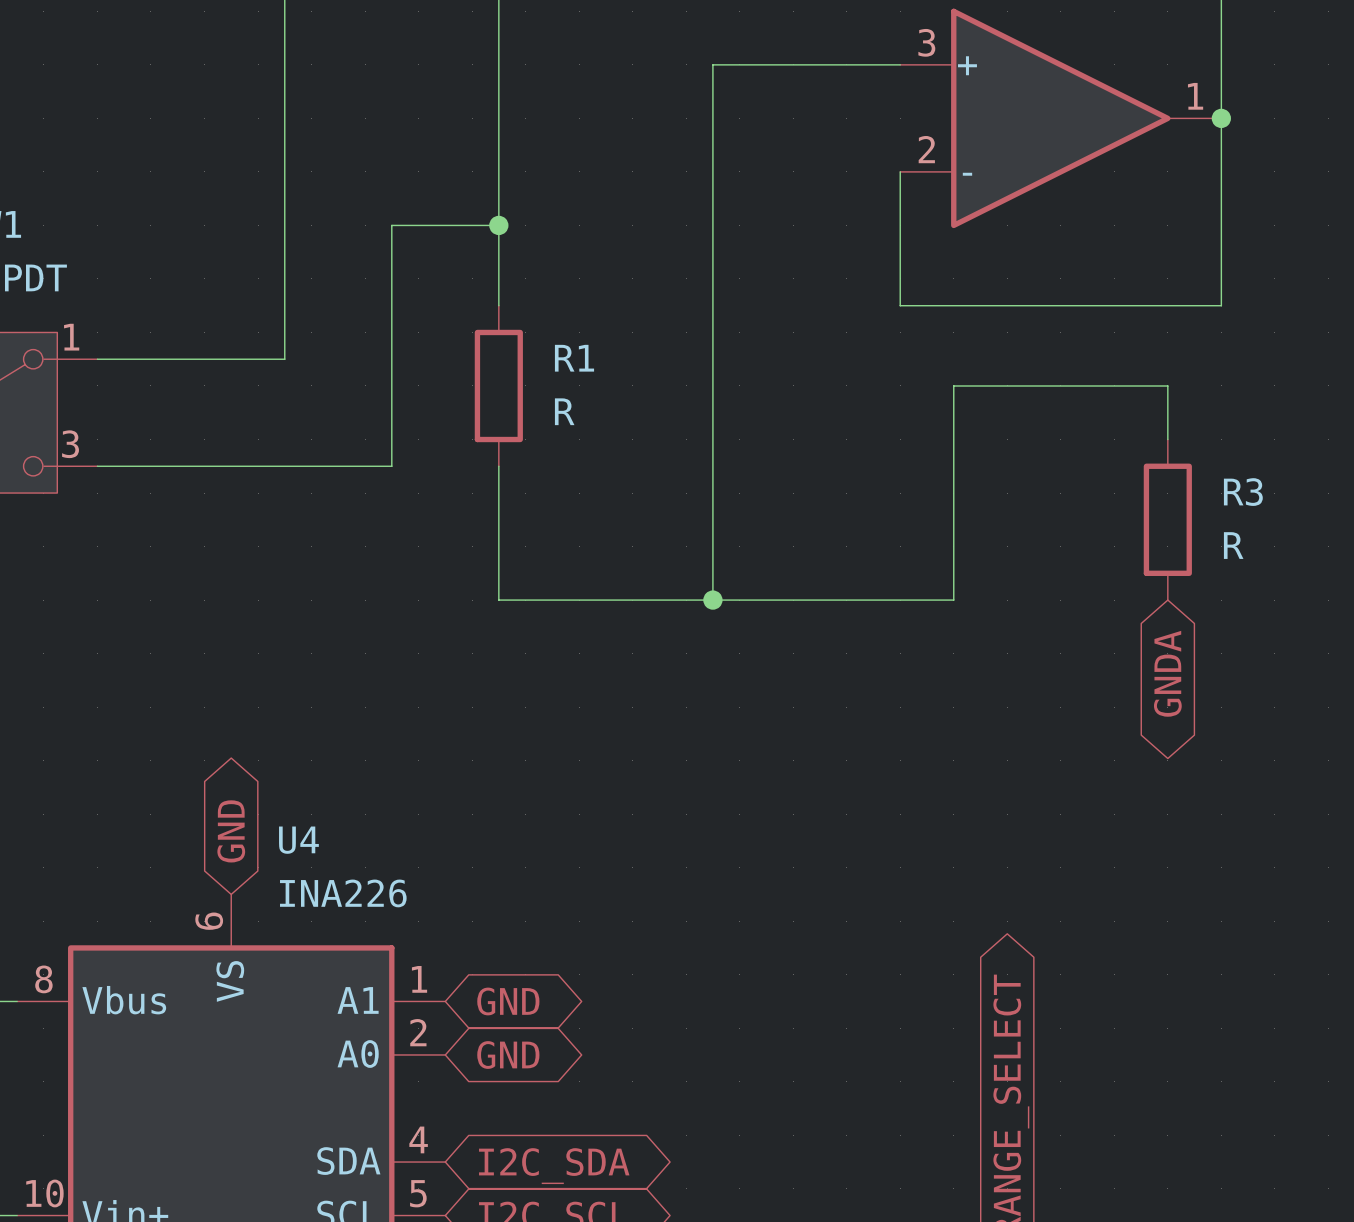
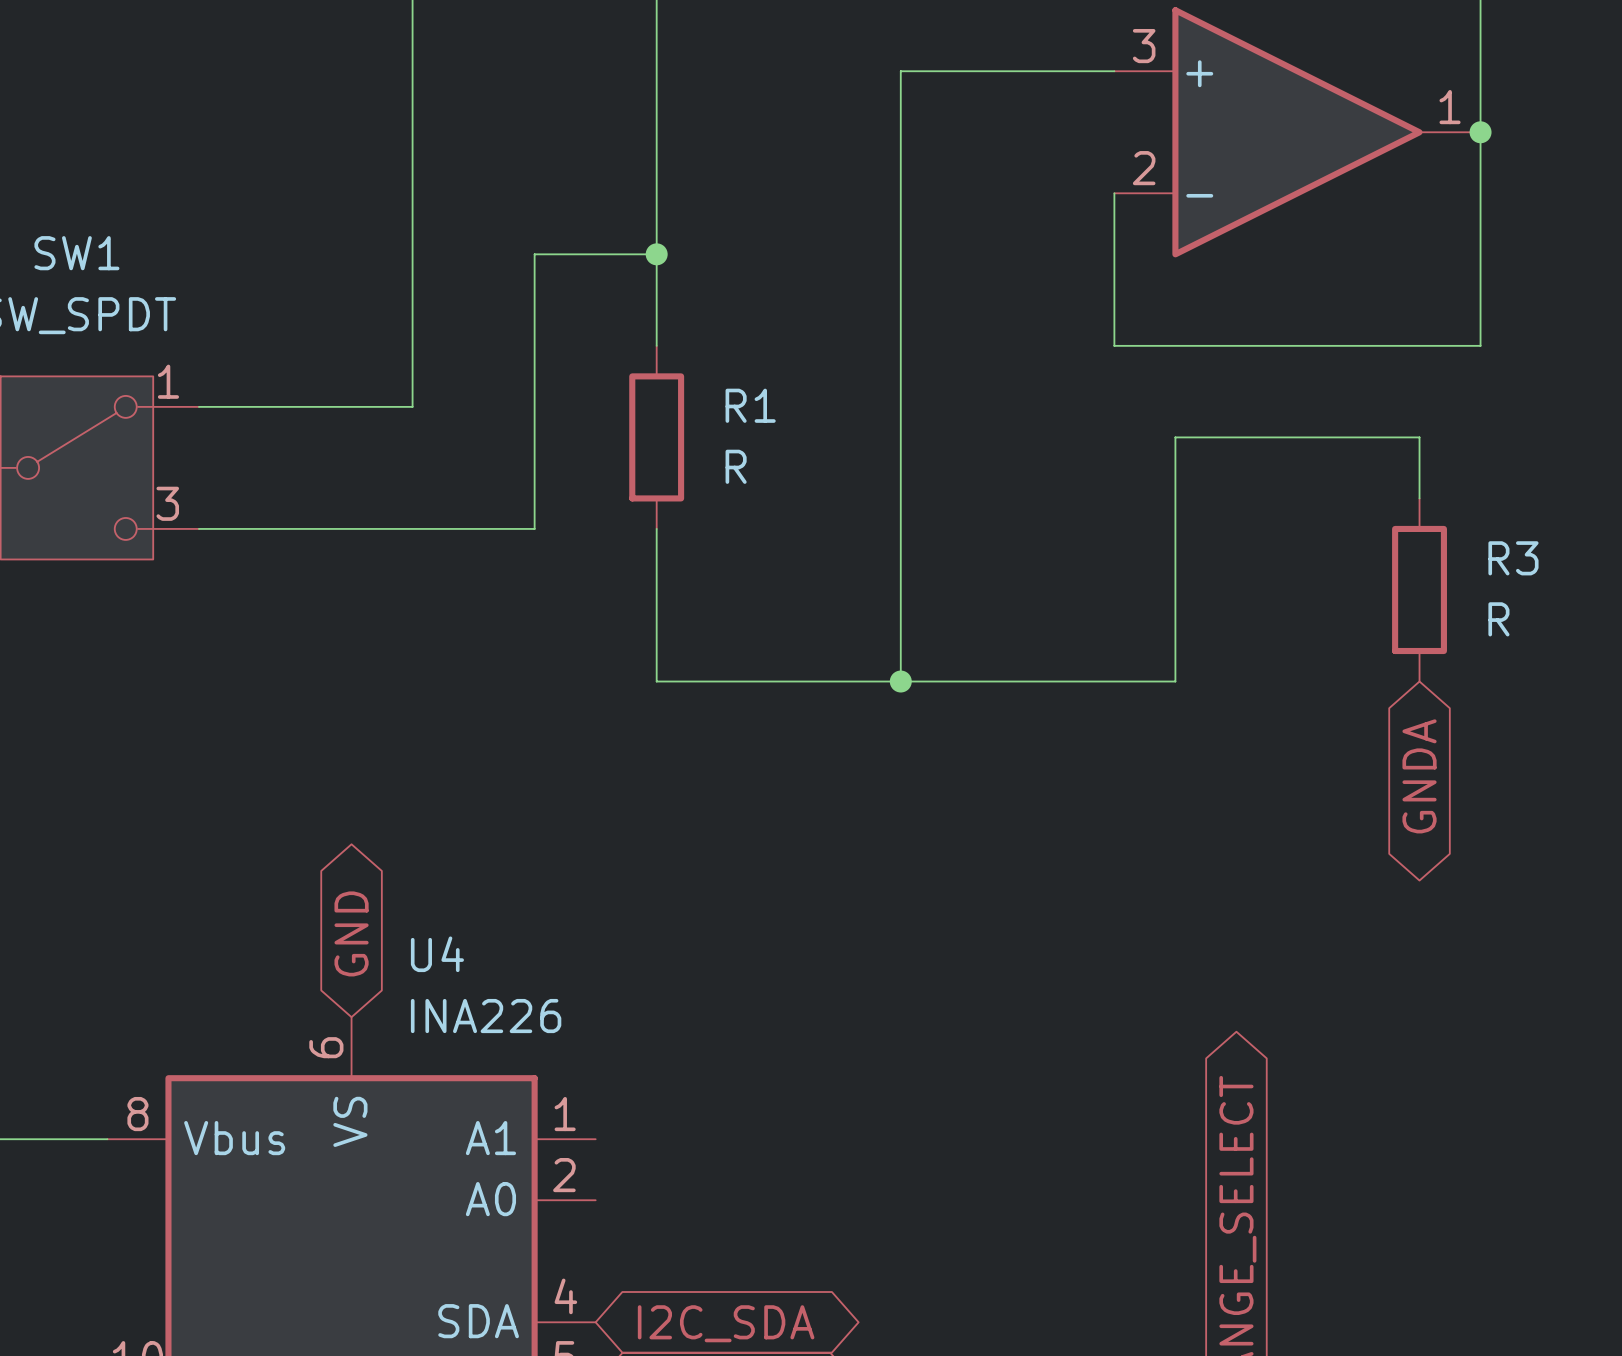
global label: GND (508, 1001) -> none
global label: GND (508, 1055) -> none

